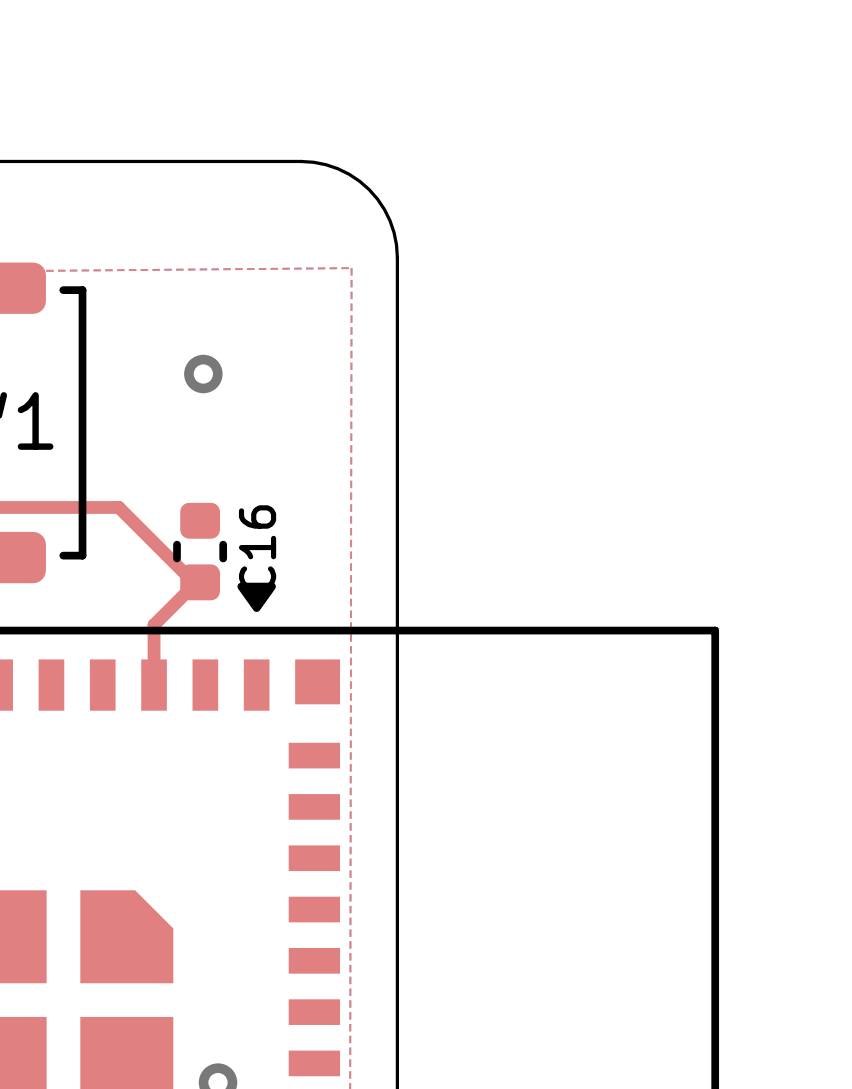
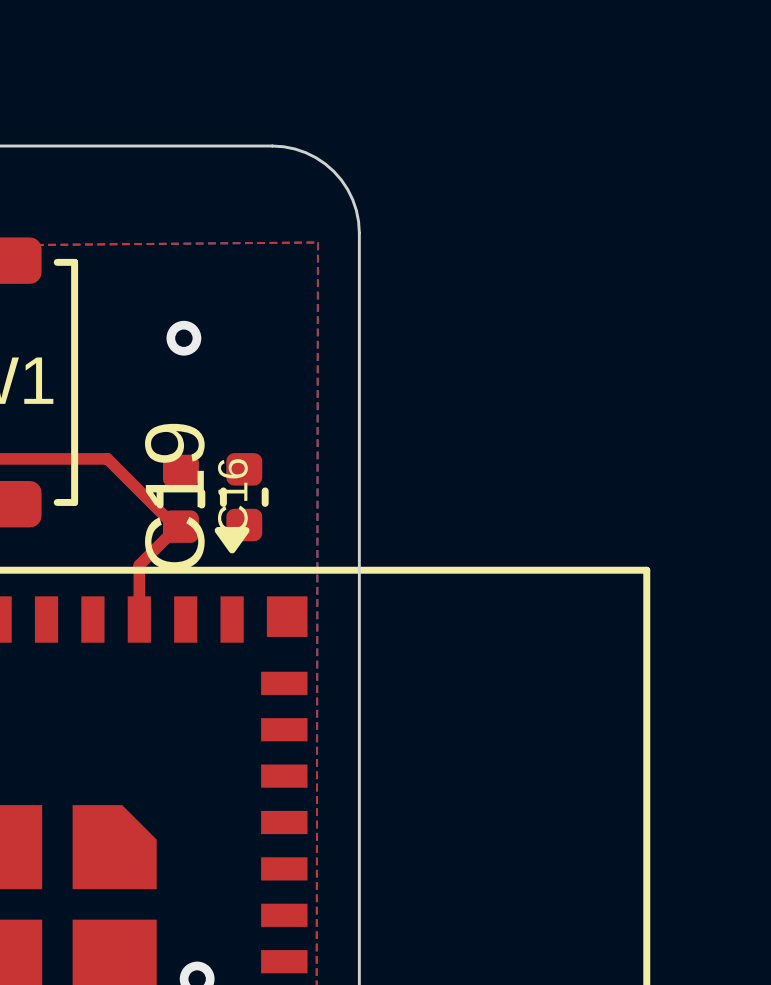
C19: none -> (244, 497)

